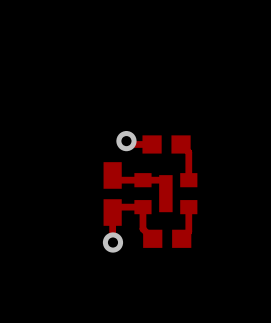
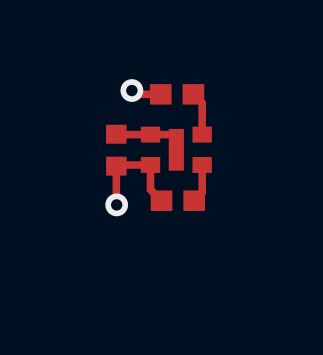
part footprint: [103, 162, 122, 226] -> [106, 124, 127, 176]

